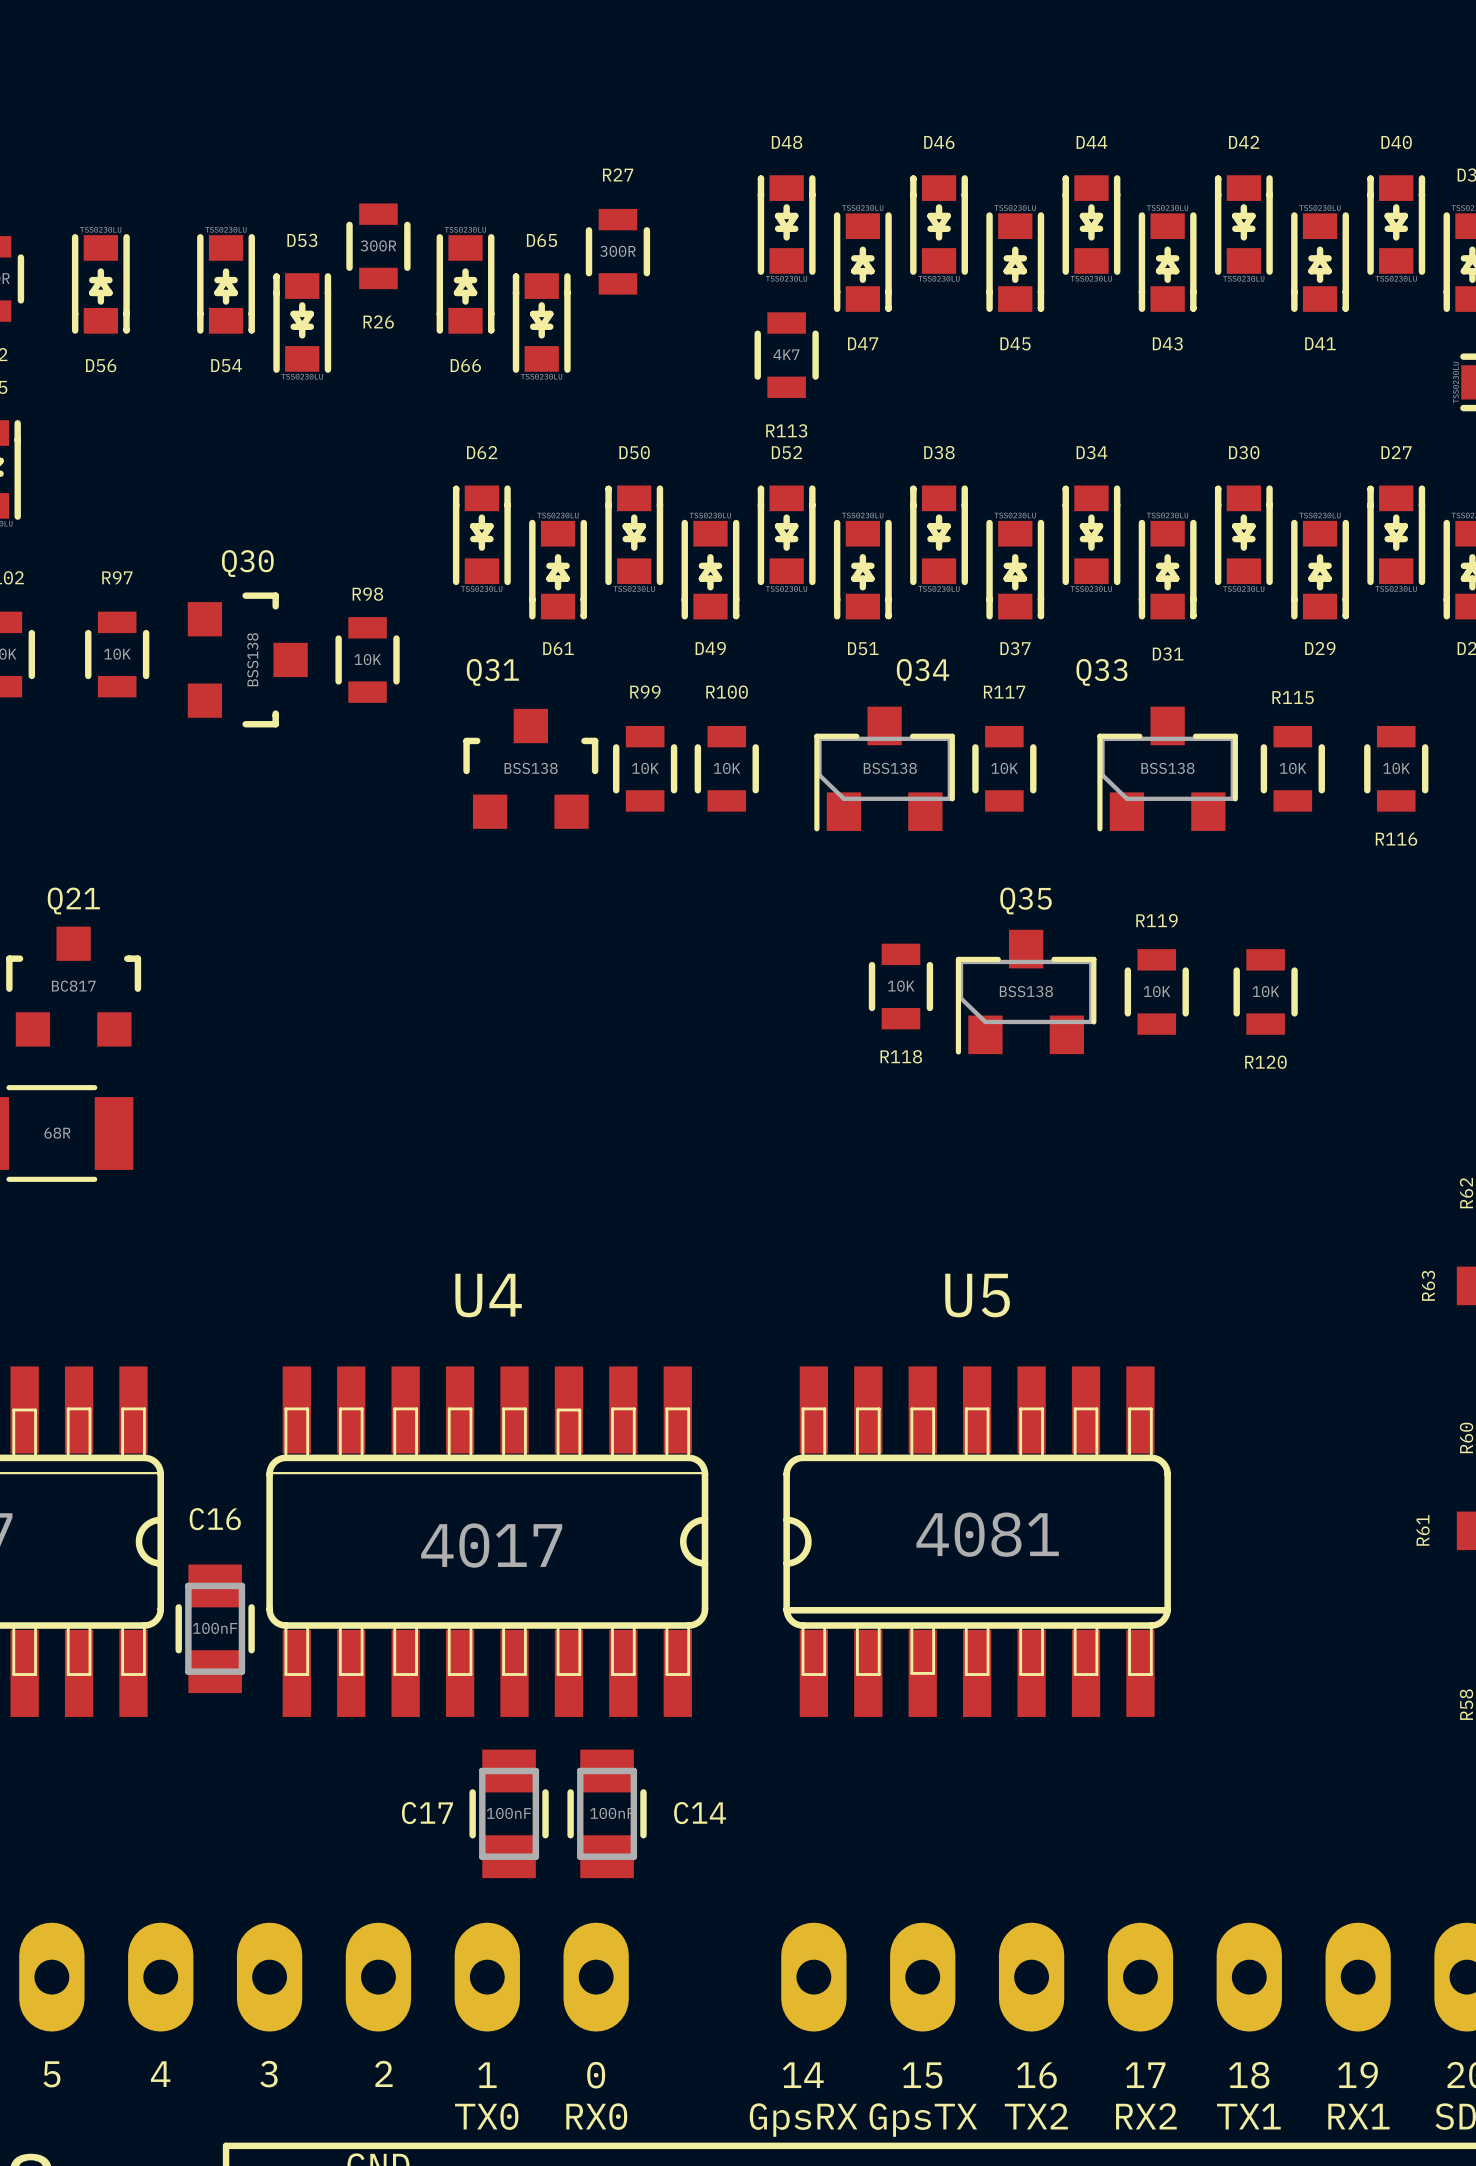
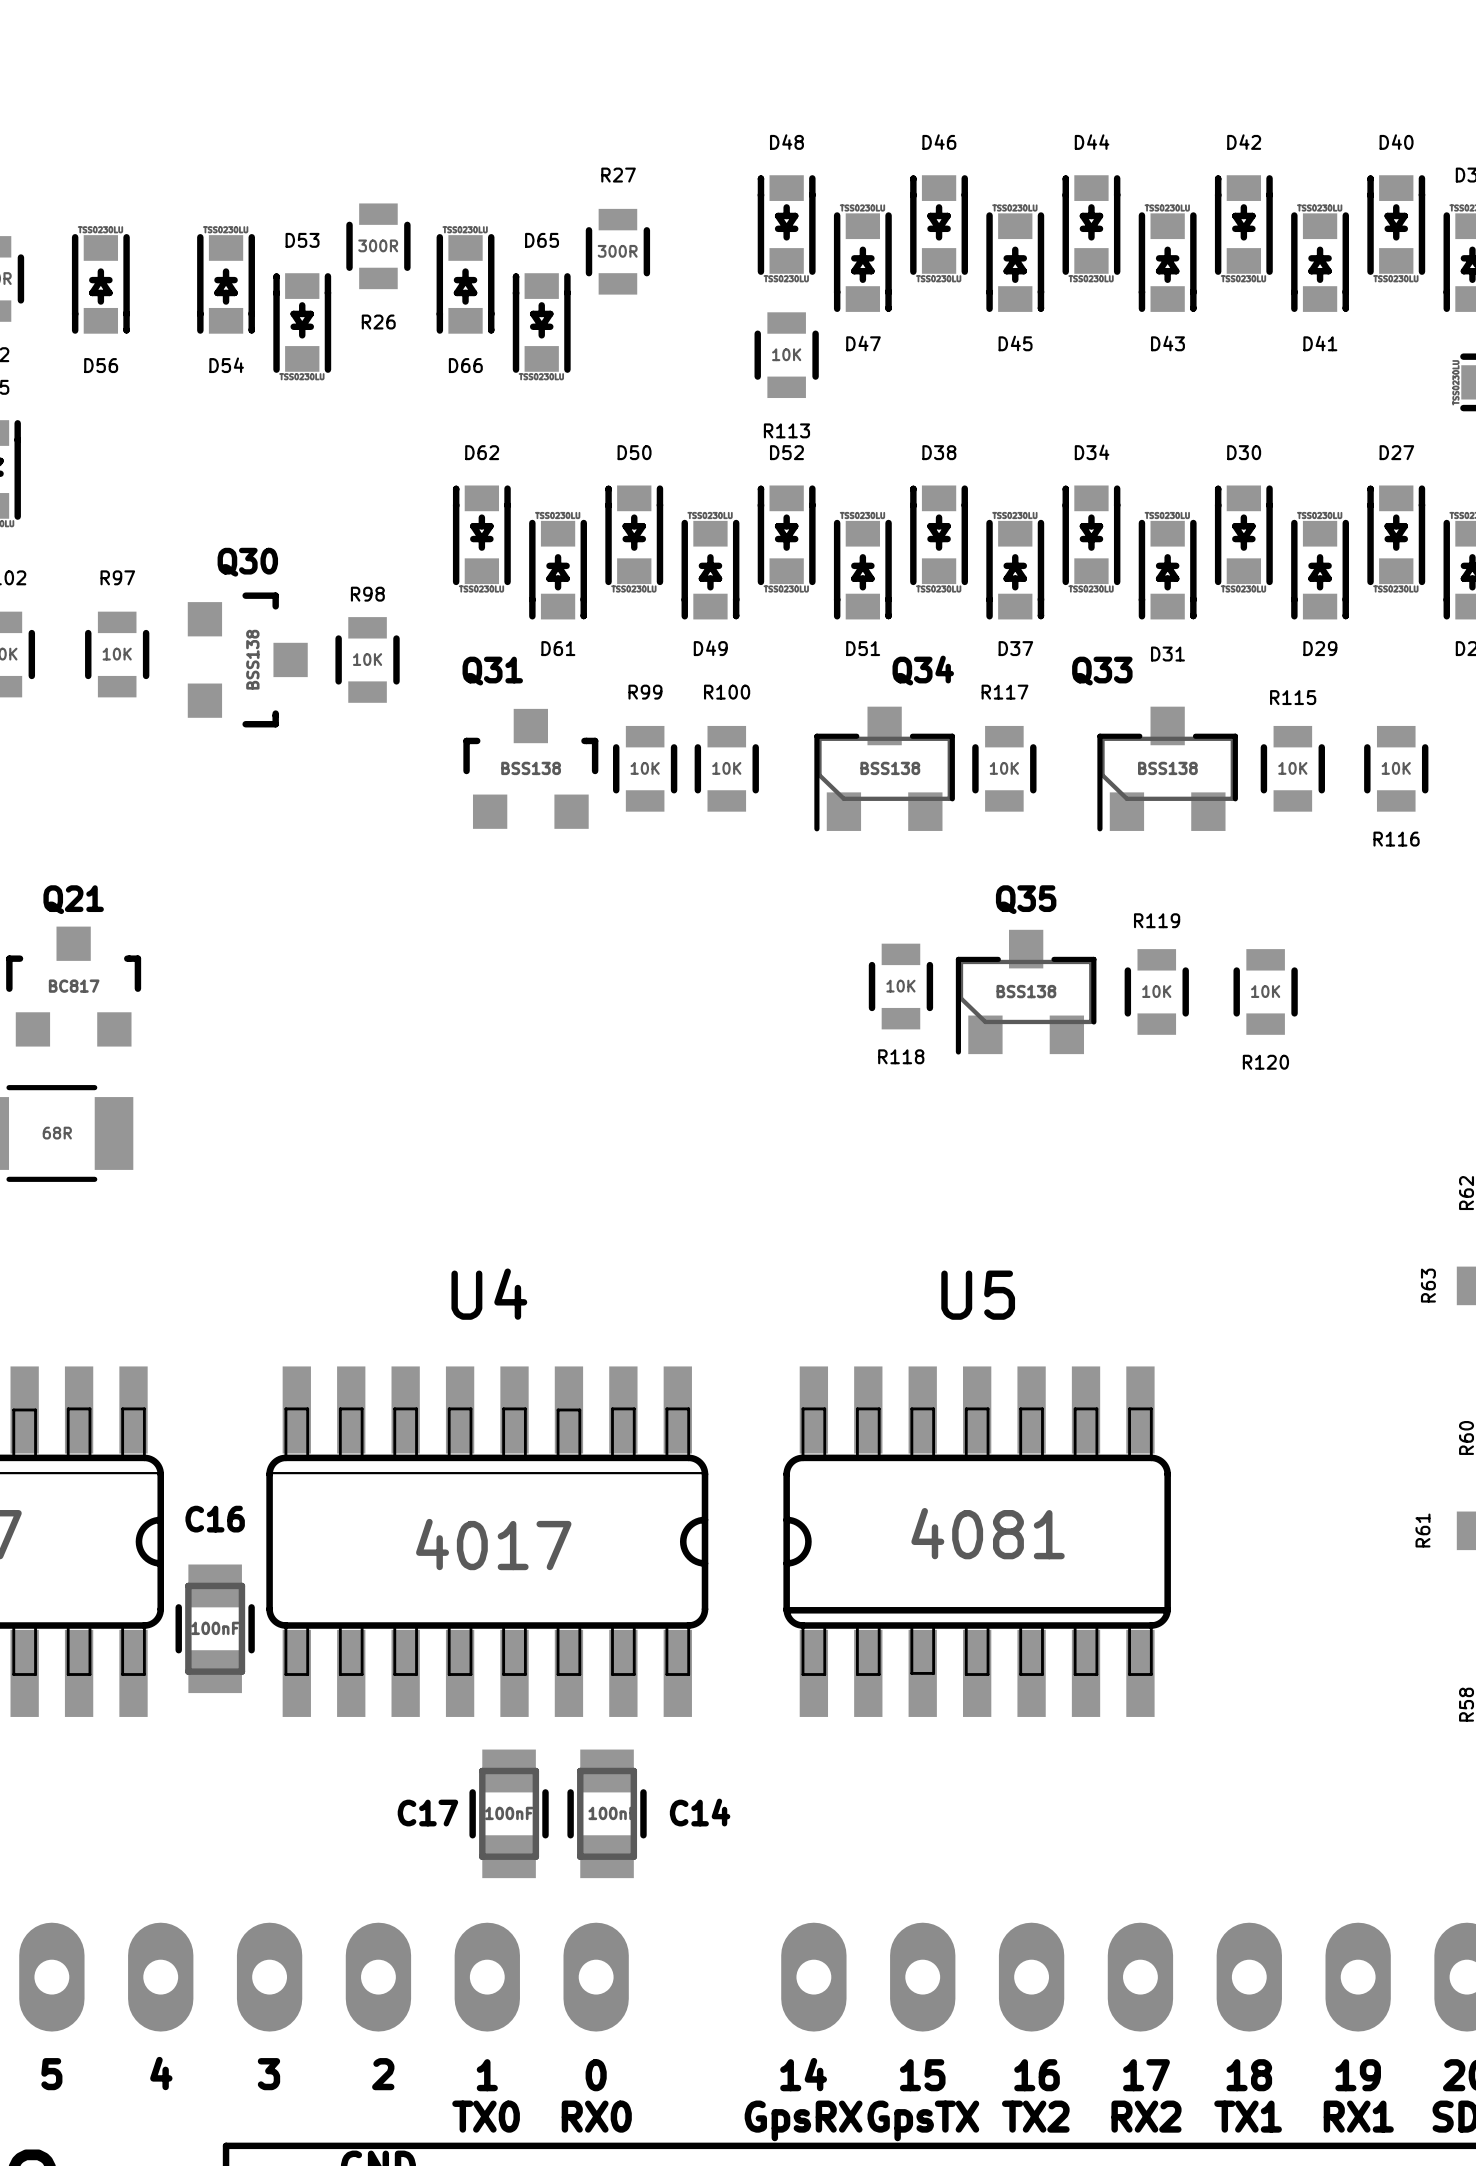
R113 value: 4K7 (786, 354) -> 10K (786, 354)

